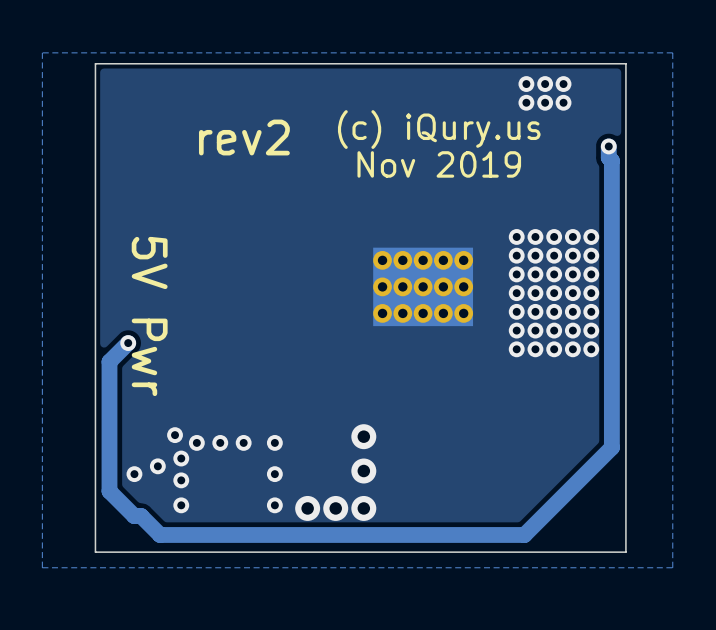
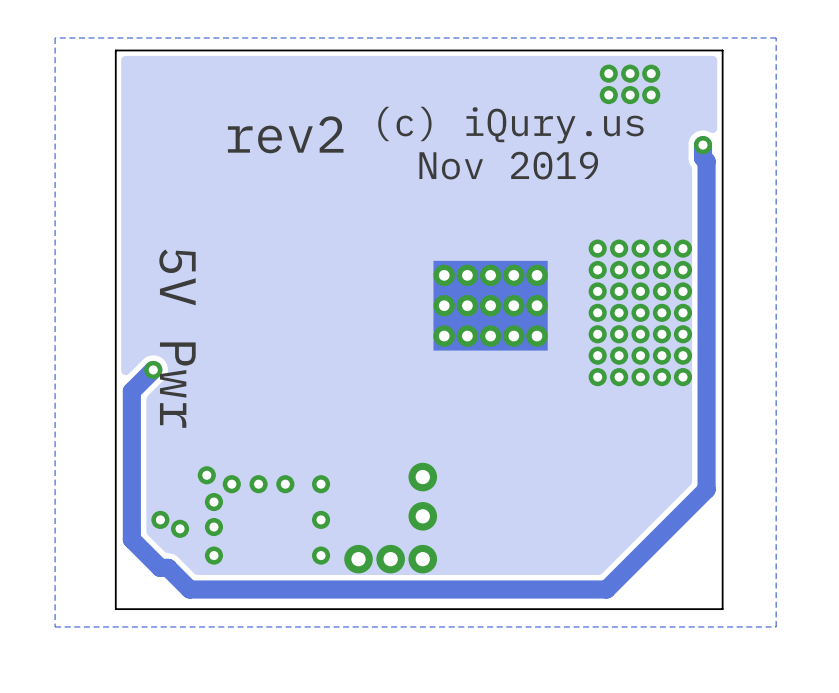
via position: (157, 466) -> (180, 528)

